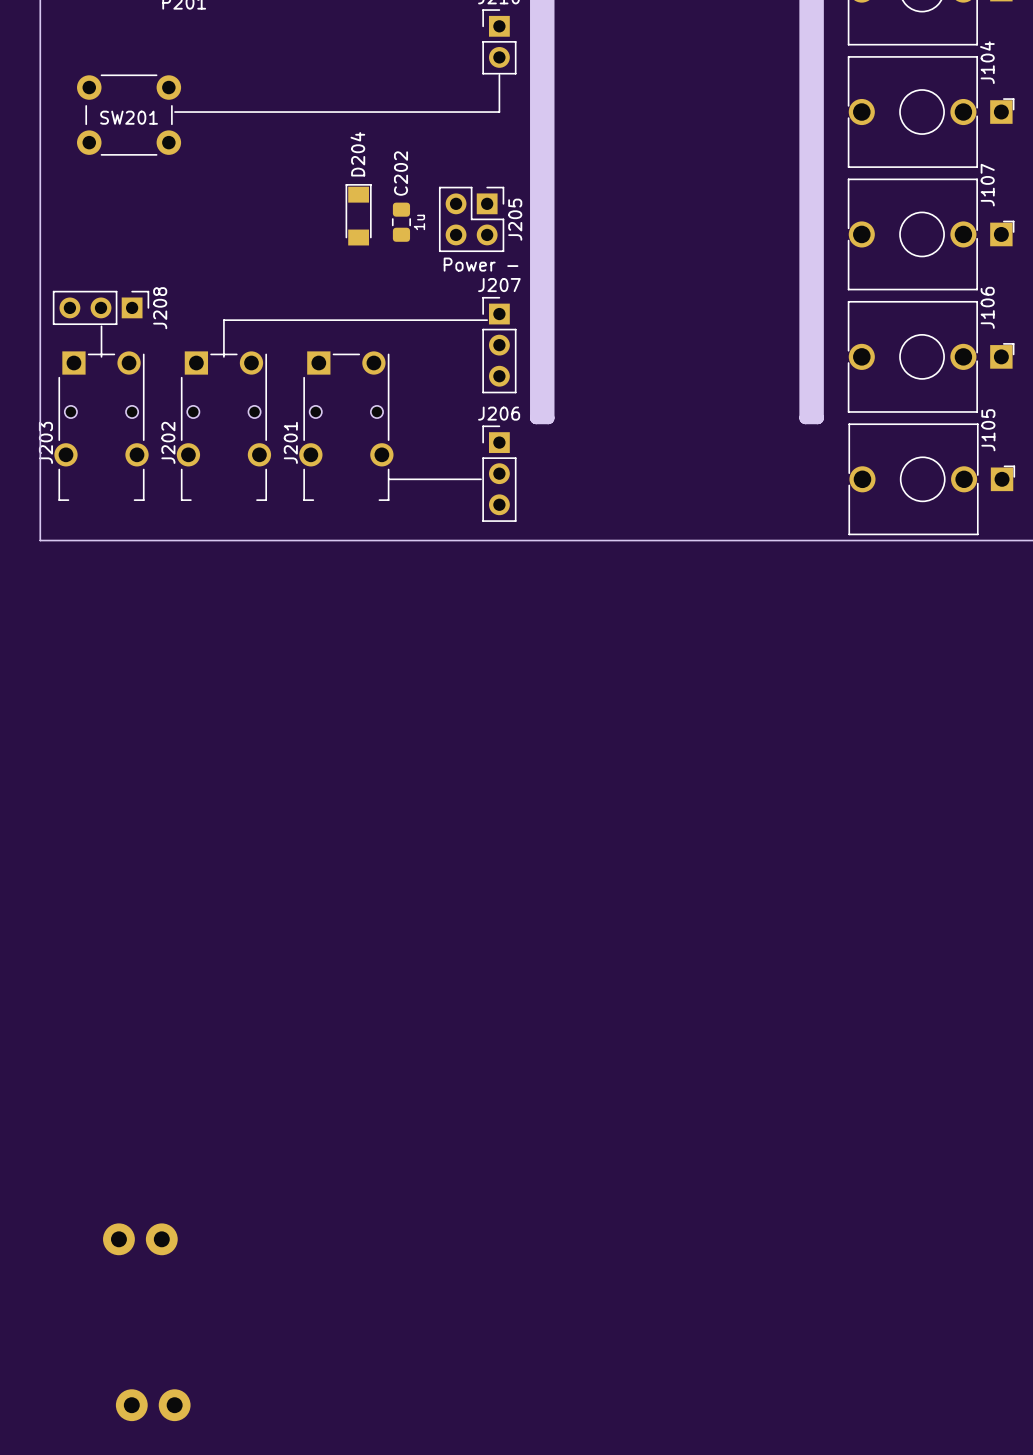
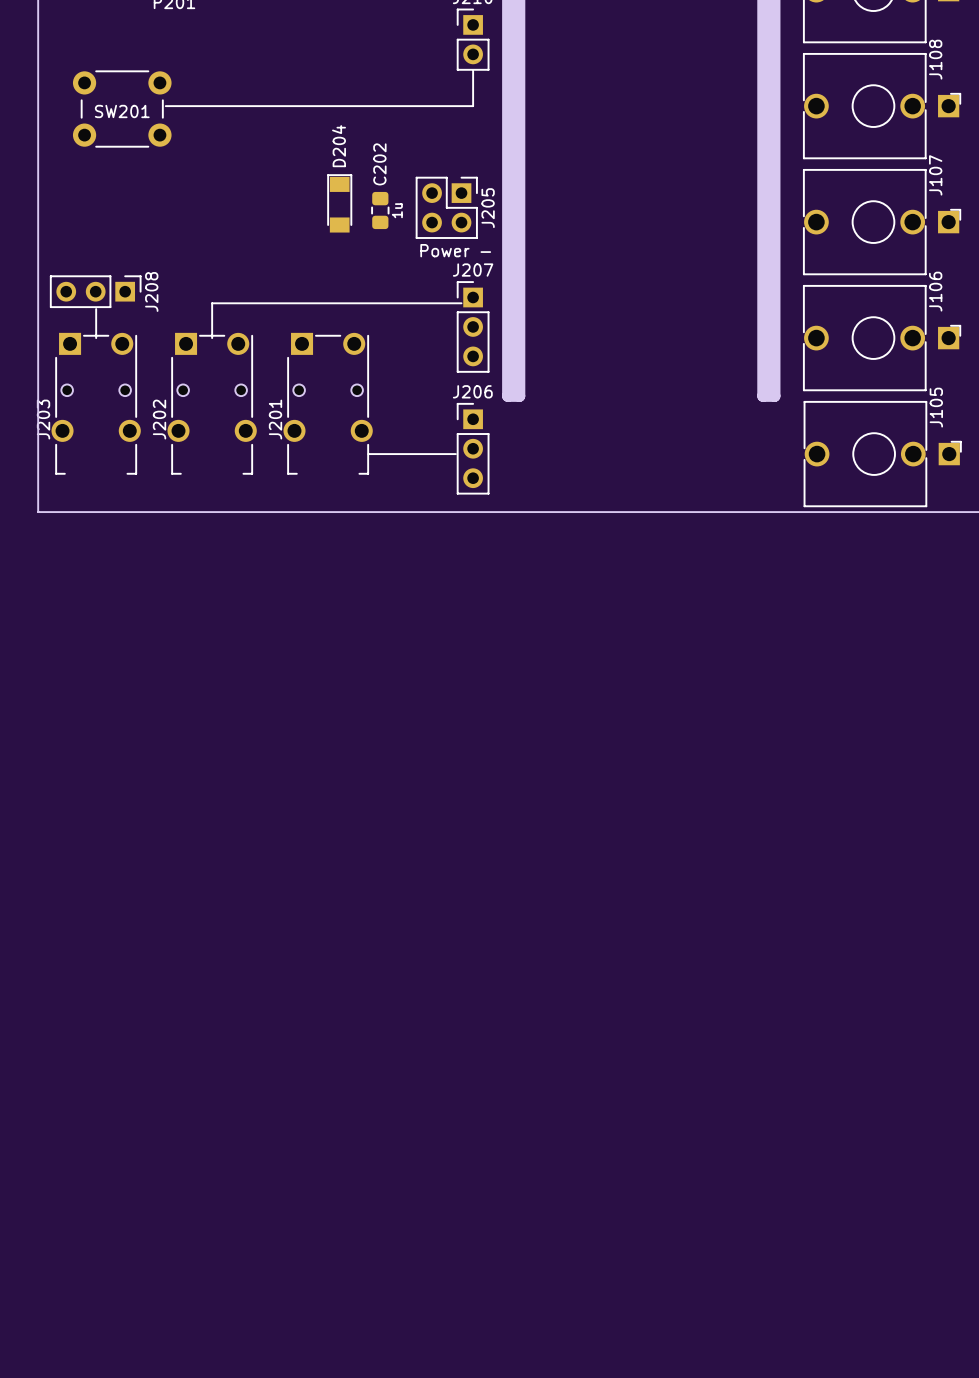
J104 name: J104 (987, 62) -> J108 (935, 59)
part: (140, 1239) -> none
part: (153, 1405) -> none

